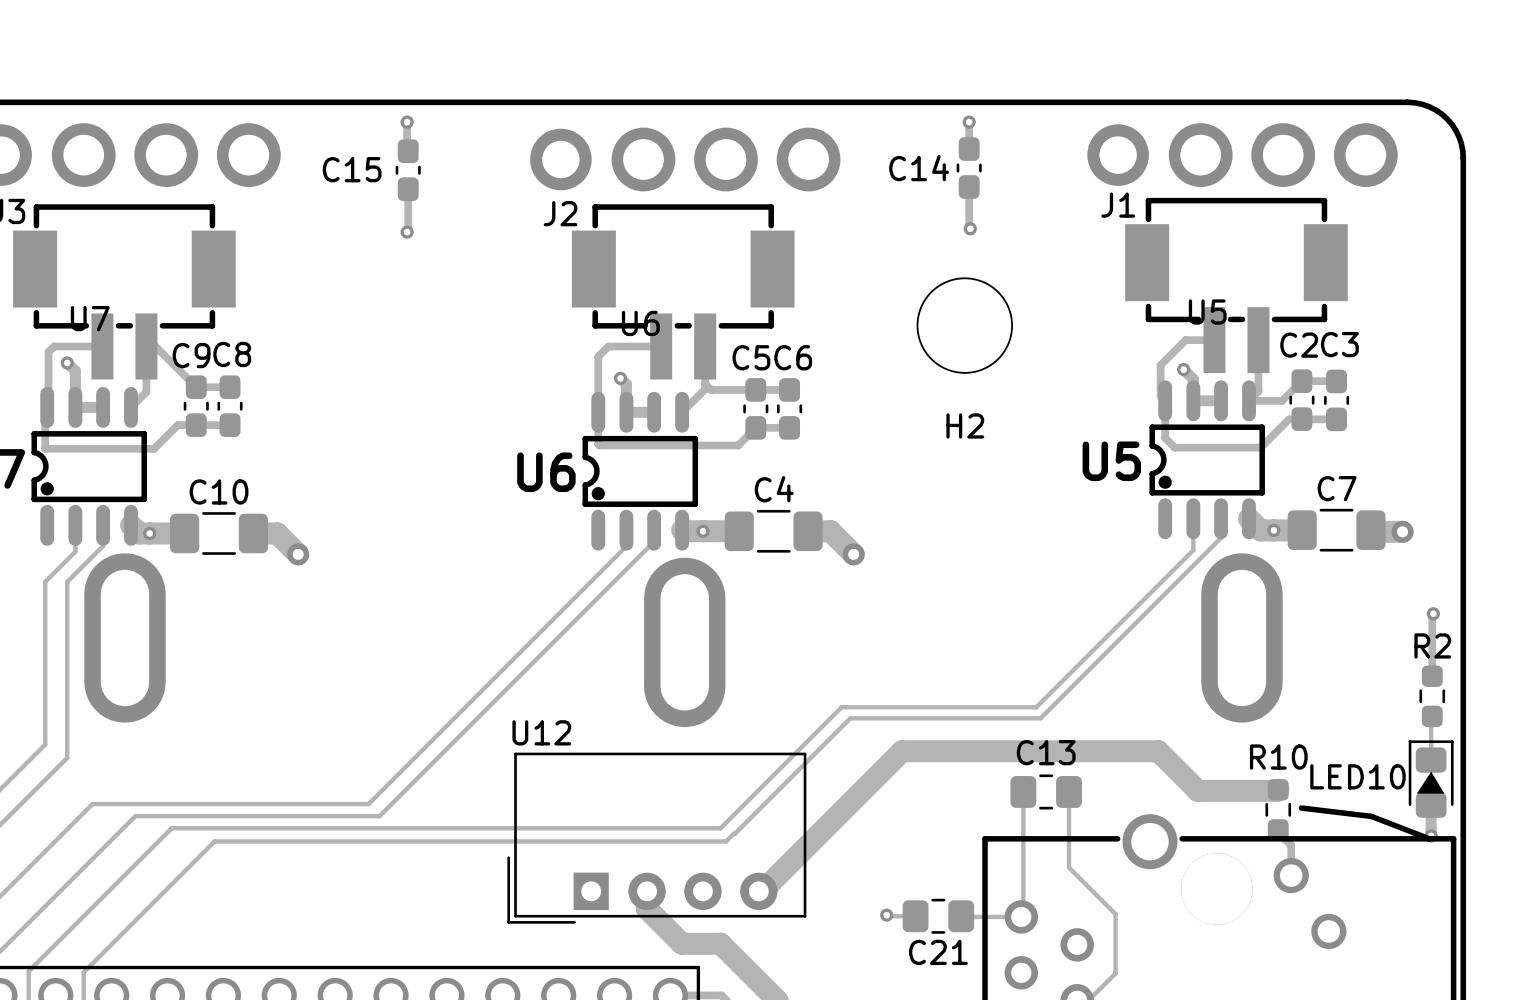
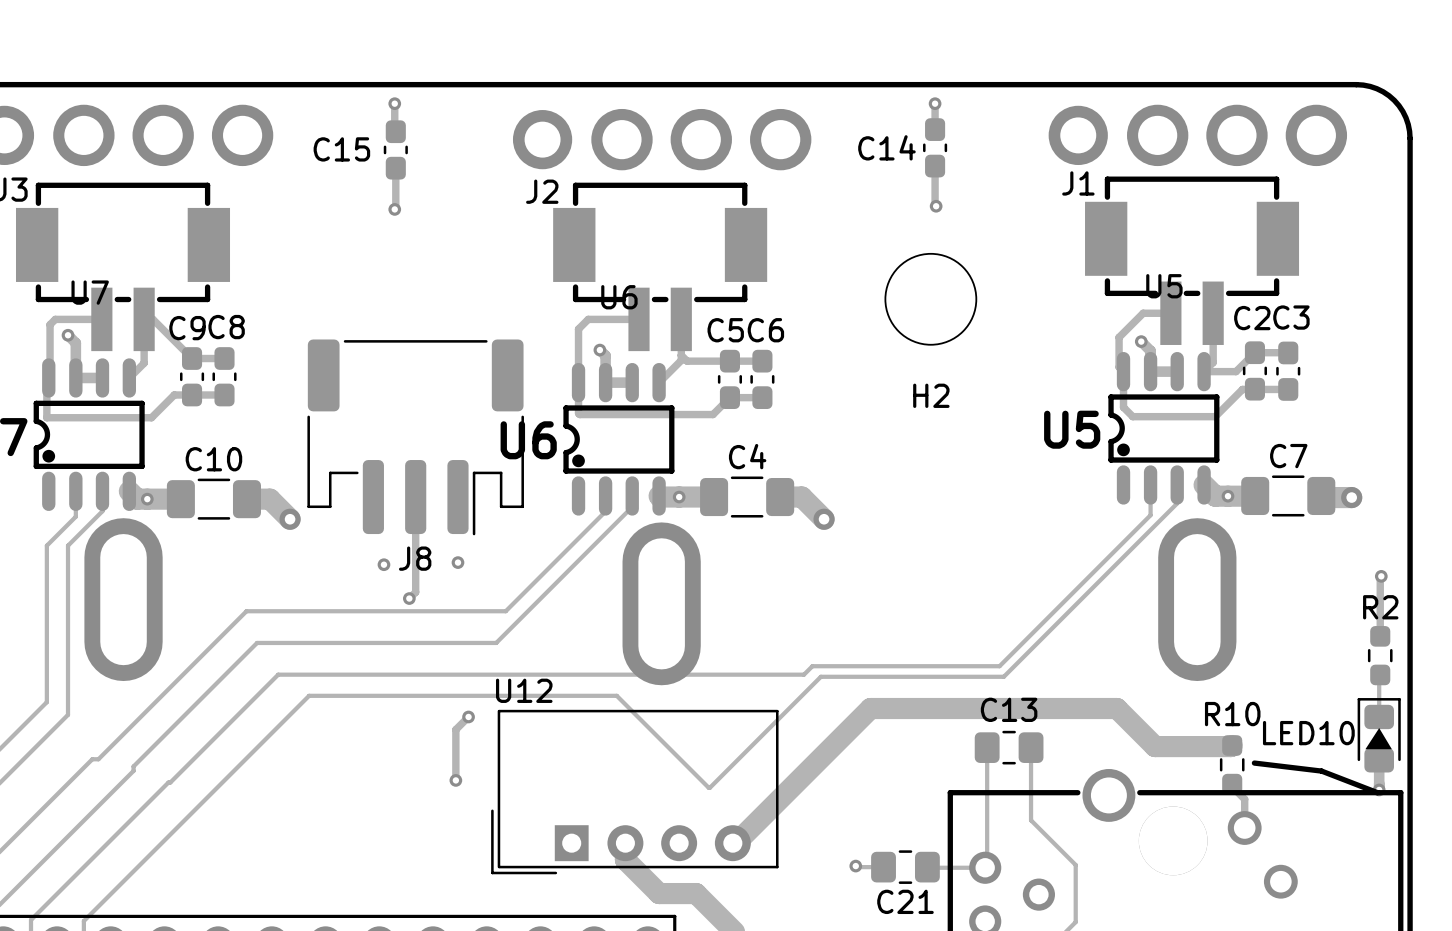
J8: none -> (415, 437)
track: none -> (415, 497) (415, 592) (409, 598)
via: none -> (457, 562)
via: none -> (383, 564)
via: none -> (409, 598)
track: (522, 650) (368, 804) (98, 804) -> (505, 611) (246, 611) (98, 759)
track: (512, 683) (379, 816) (135, 816) -> (496, 642) (257, 642) (133, 766) (133, 770)
track: (832, 716) (720, 828) (173, 828) -> (803, 674) (278, 674) (170, 782)
track: none -> (468, 716) (455, 729) (455, 780)
via: none -> (468, 716)
via: none -> (455, 780)
track: (733, 833) (726, 841) (214, 841) -> (708, 787) (616, 695) (309, 695) (209, 795)

